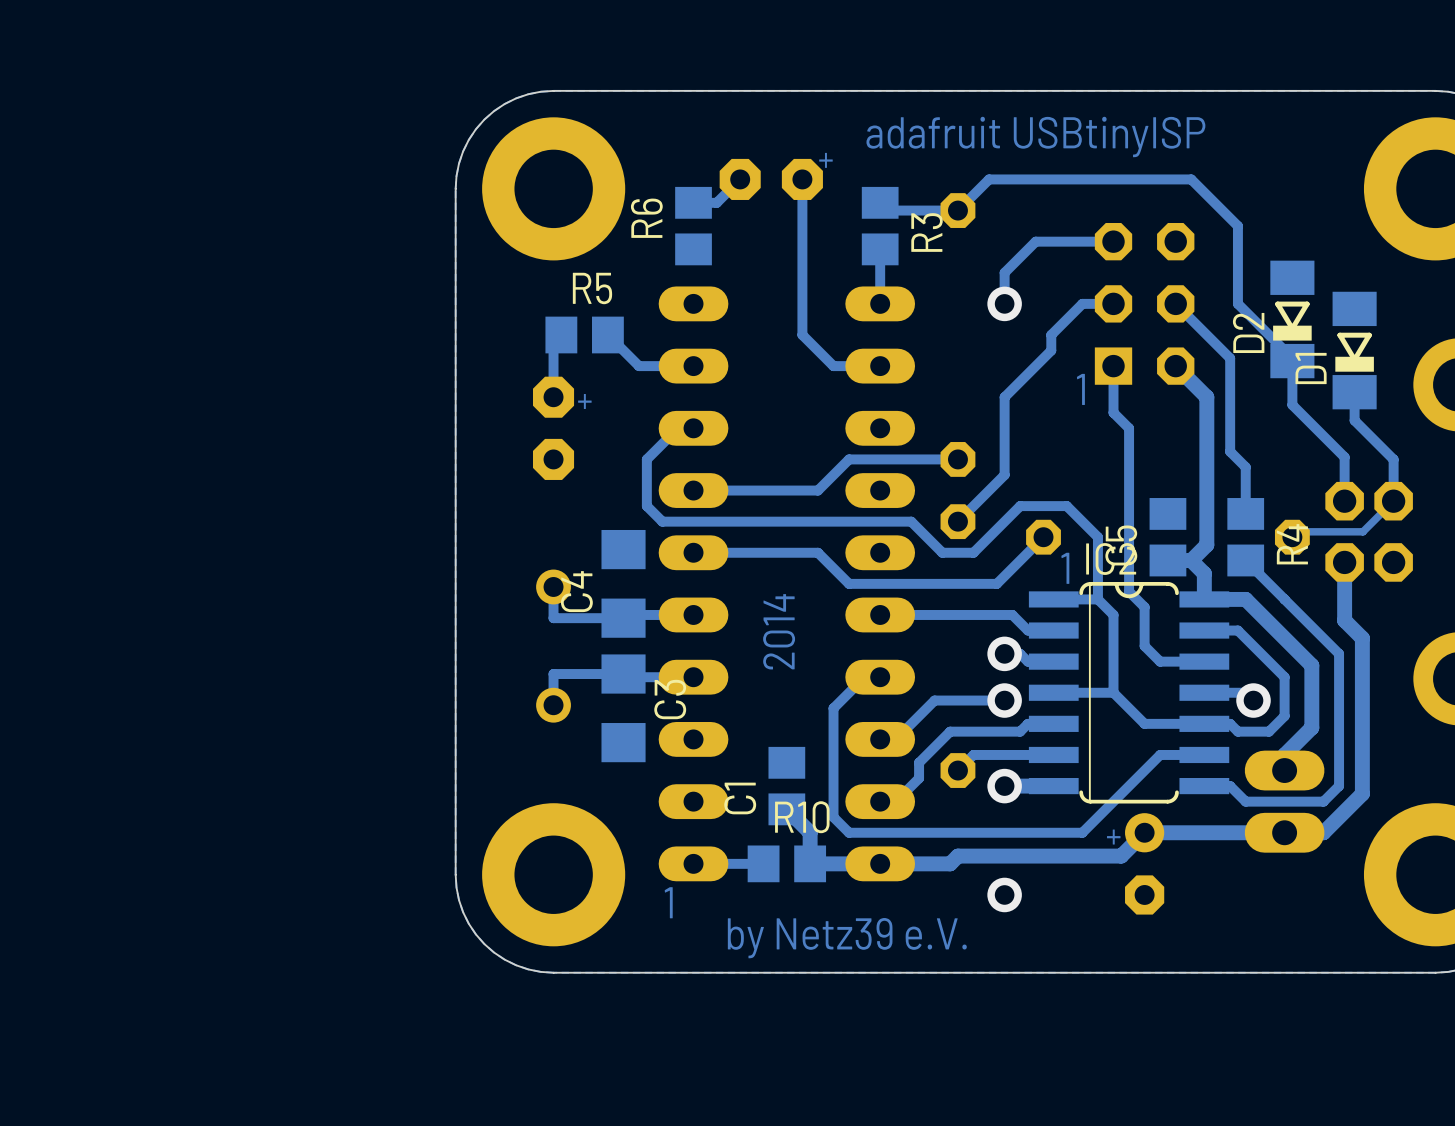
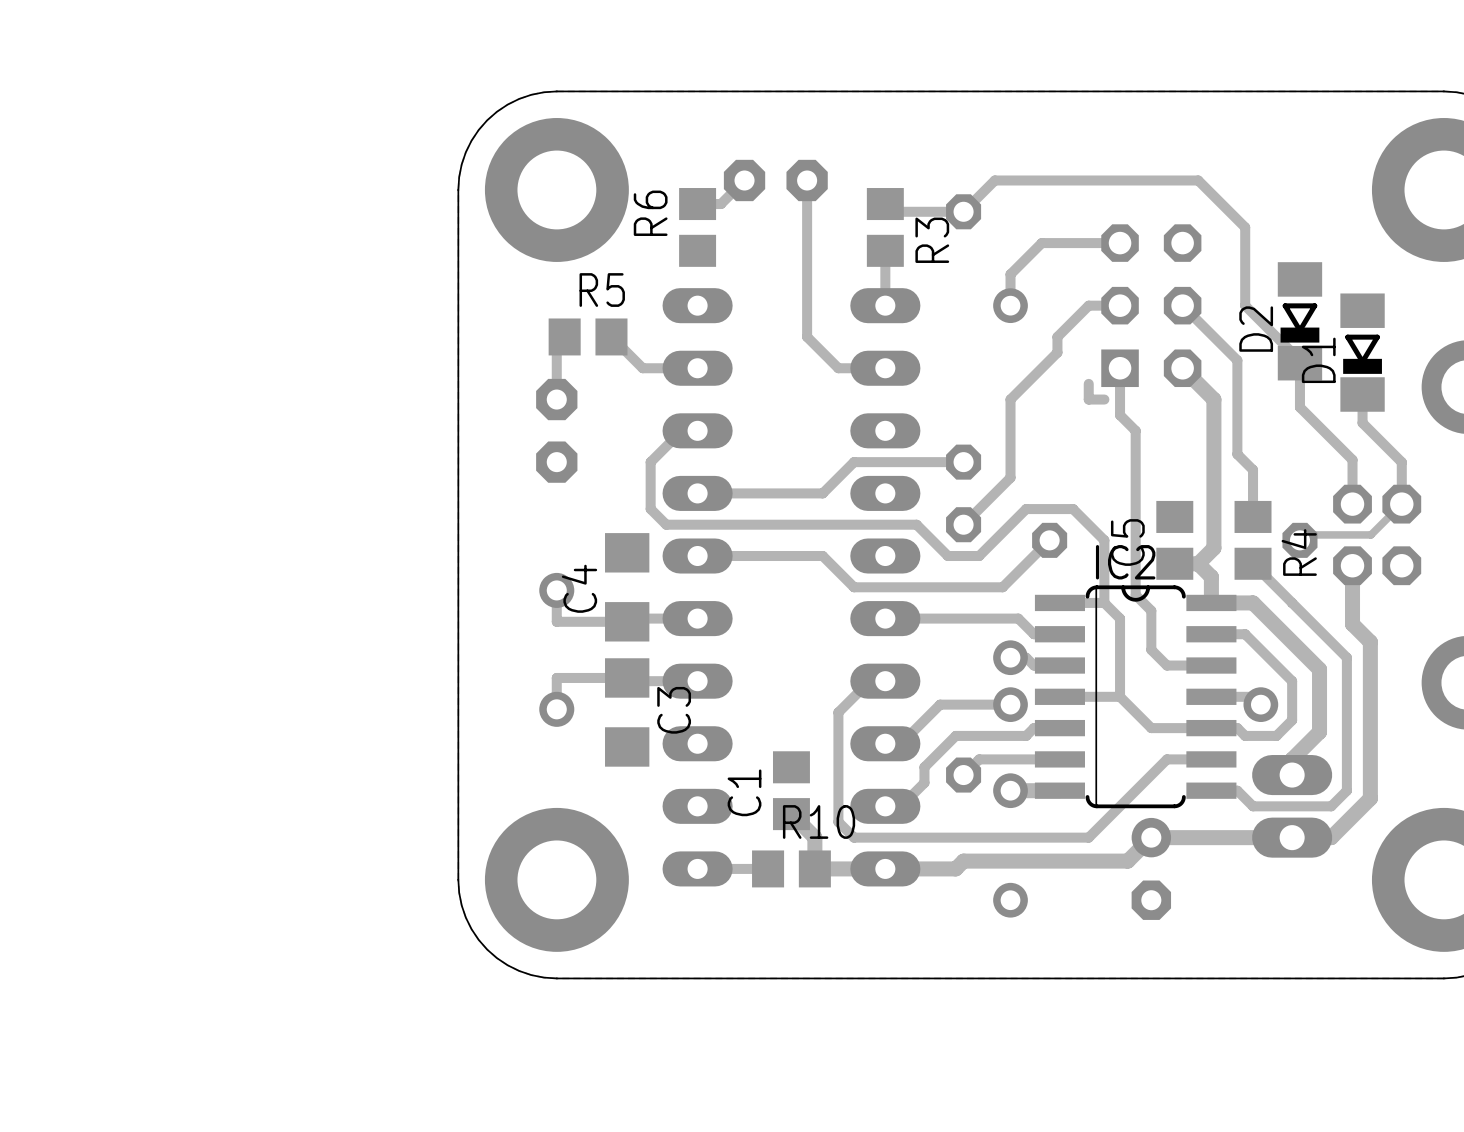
text: adafruit USBtinyISP (1035, 137) -> none
text: + (825, 160) -> none
track: none -> (1088, 383) (1088, 399) (1104, 399)
text: 1 (1080, 389) -> none
text: + (584, 401) -> none
text: 1 (1065, 568) -> none
text: 2014 (779, 631) -> none
text: + (1113, 837) -> none
text: 1 (668, 902) -> none
text: by Netz39 e.V. (847, 938) -> none

